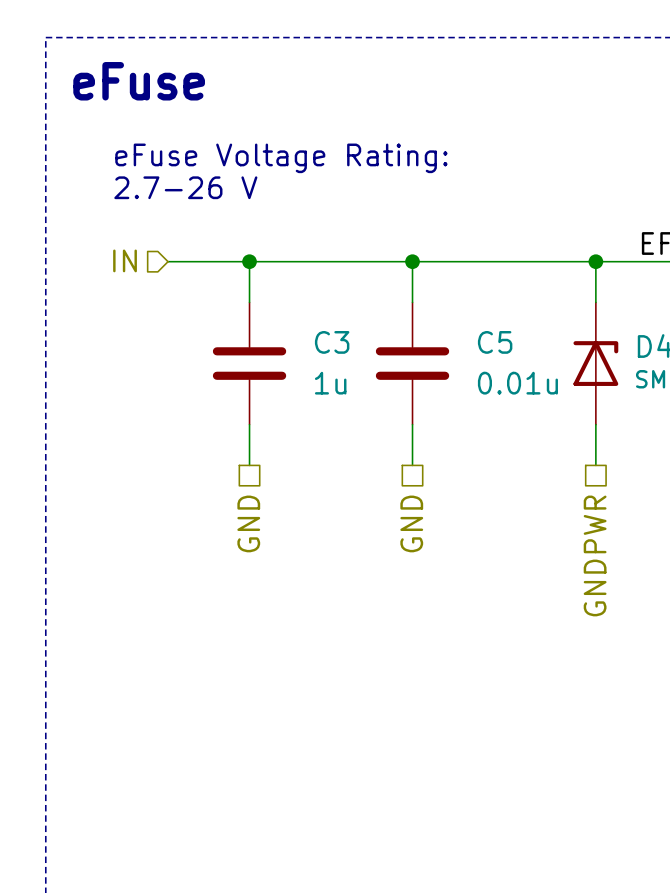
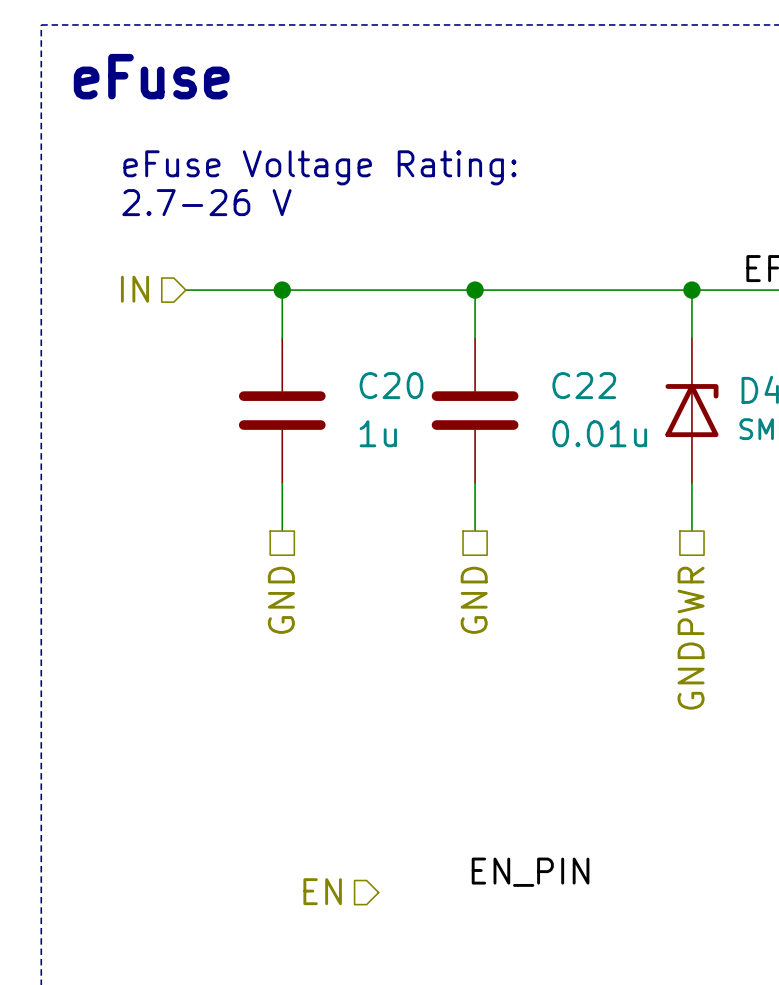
C3 name: C3 (332, 342) -> C20 (391, 385)
C5 name: C5 (495, 342) -> C22 (584, 385)
label: none -> EN_PIN (530, 872)
hierarchical label: none -> EN (322, 891)

